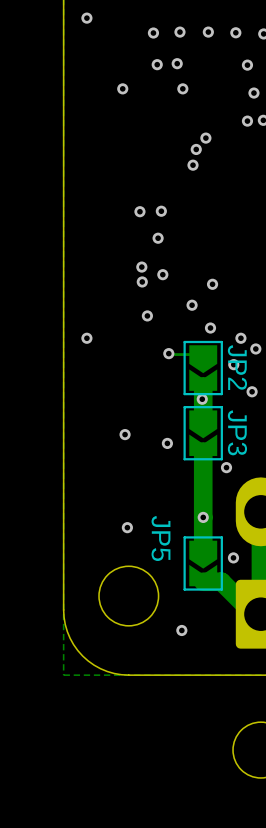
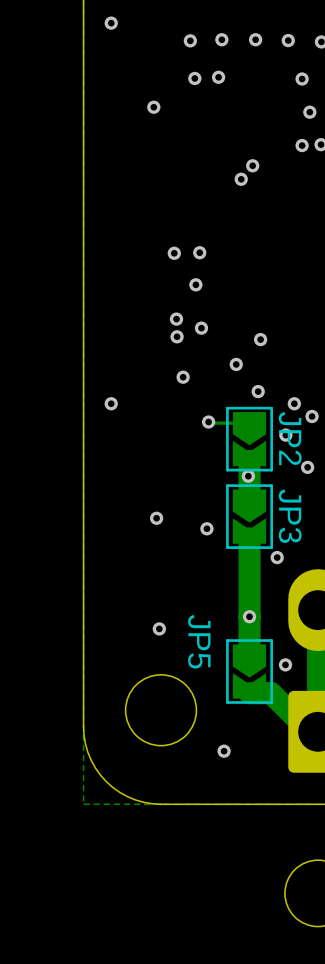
via: (182, 88) -> none
via: (193, 165) -> none

